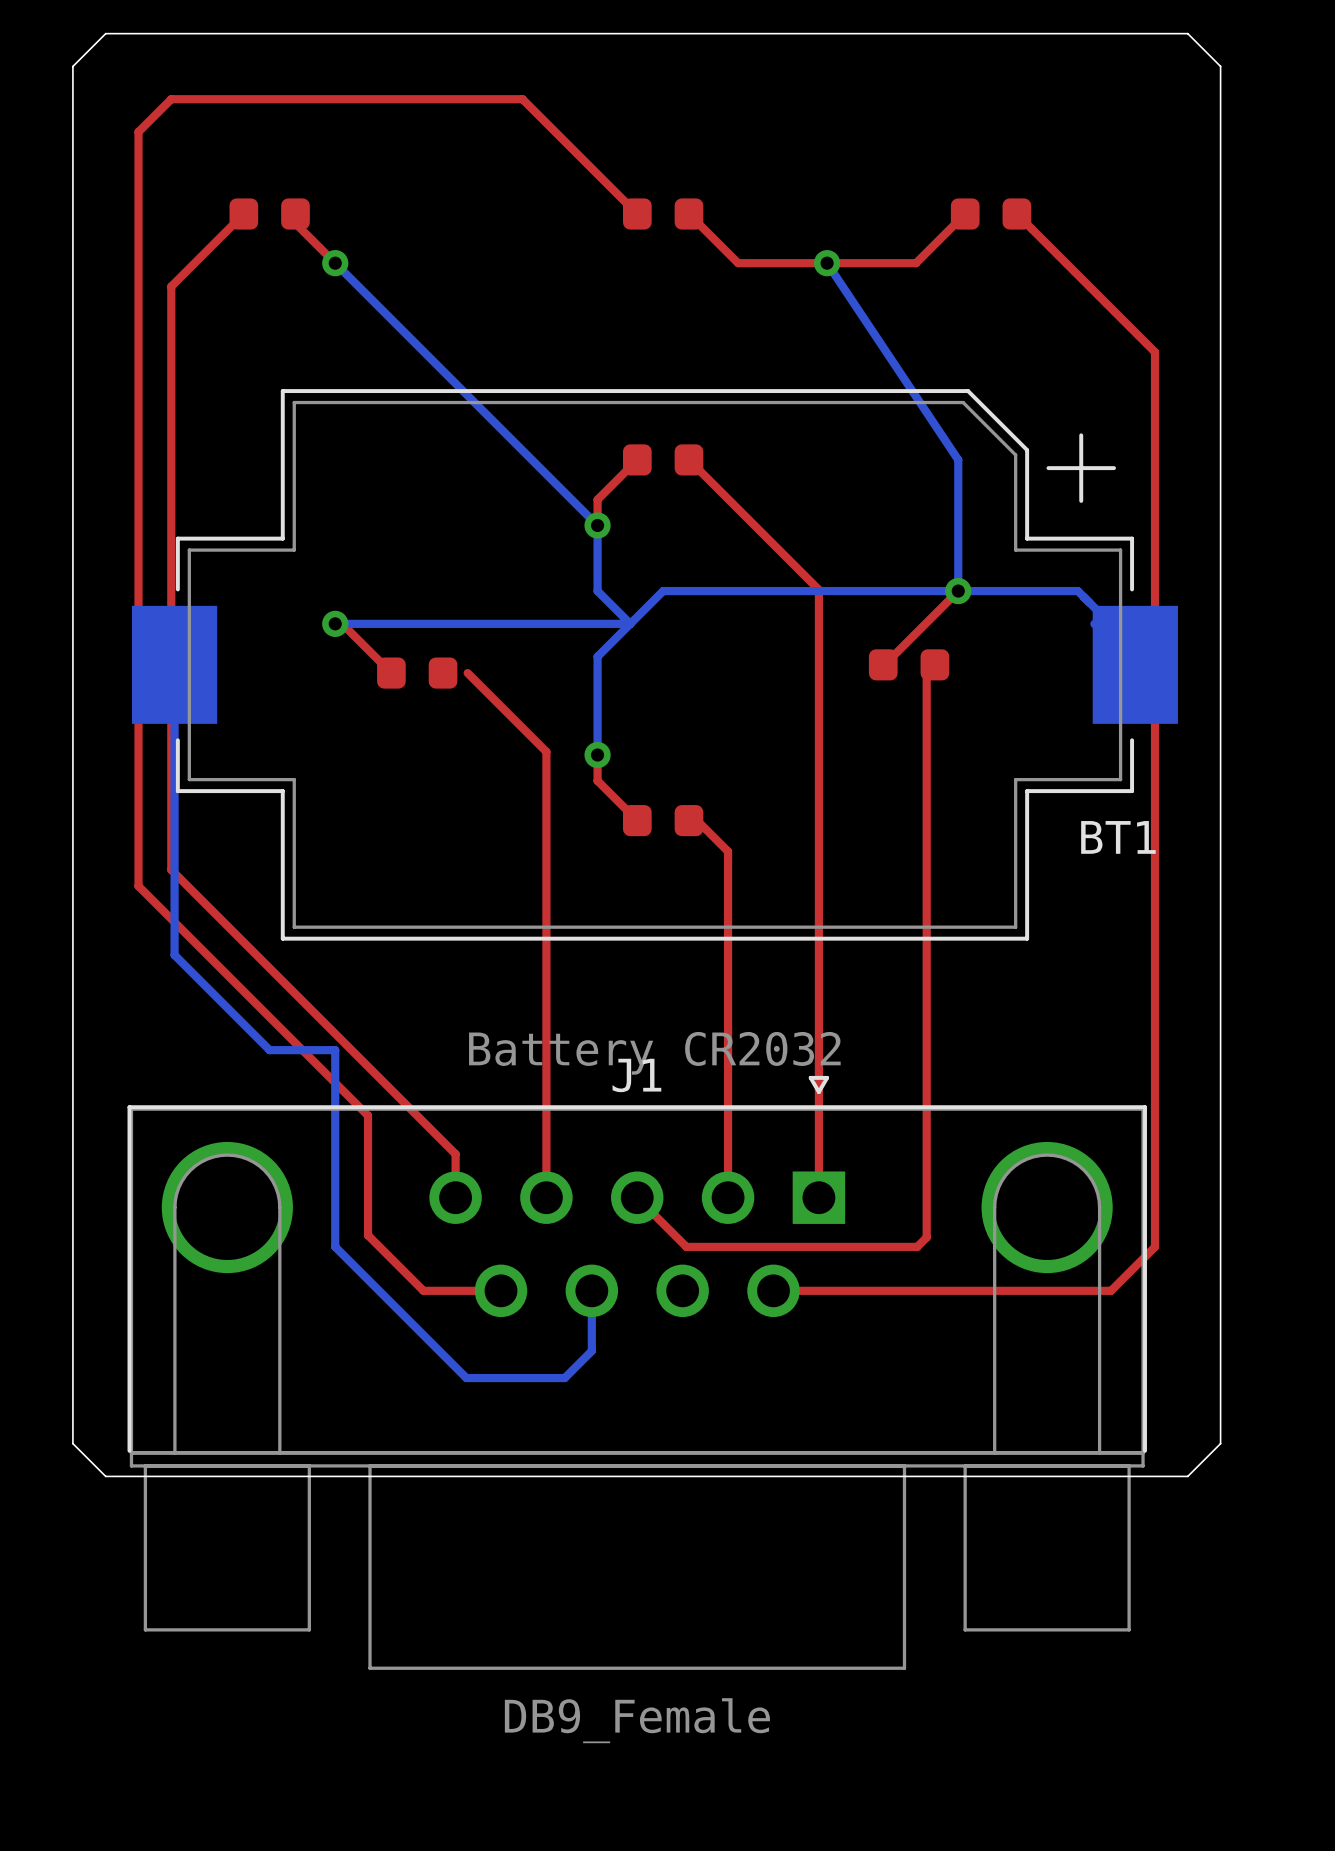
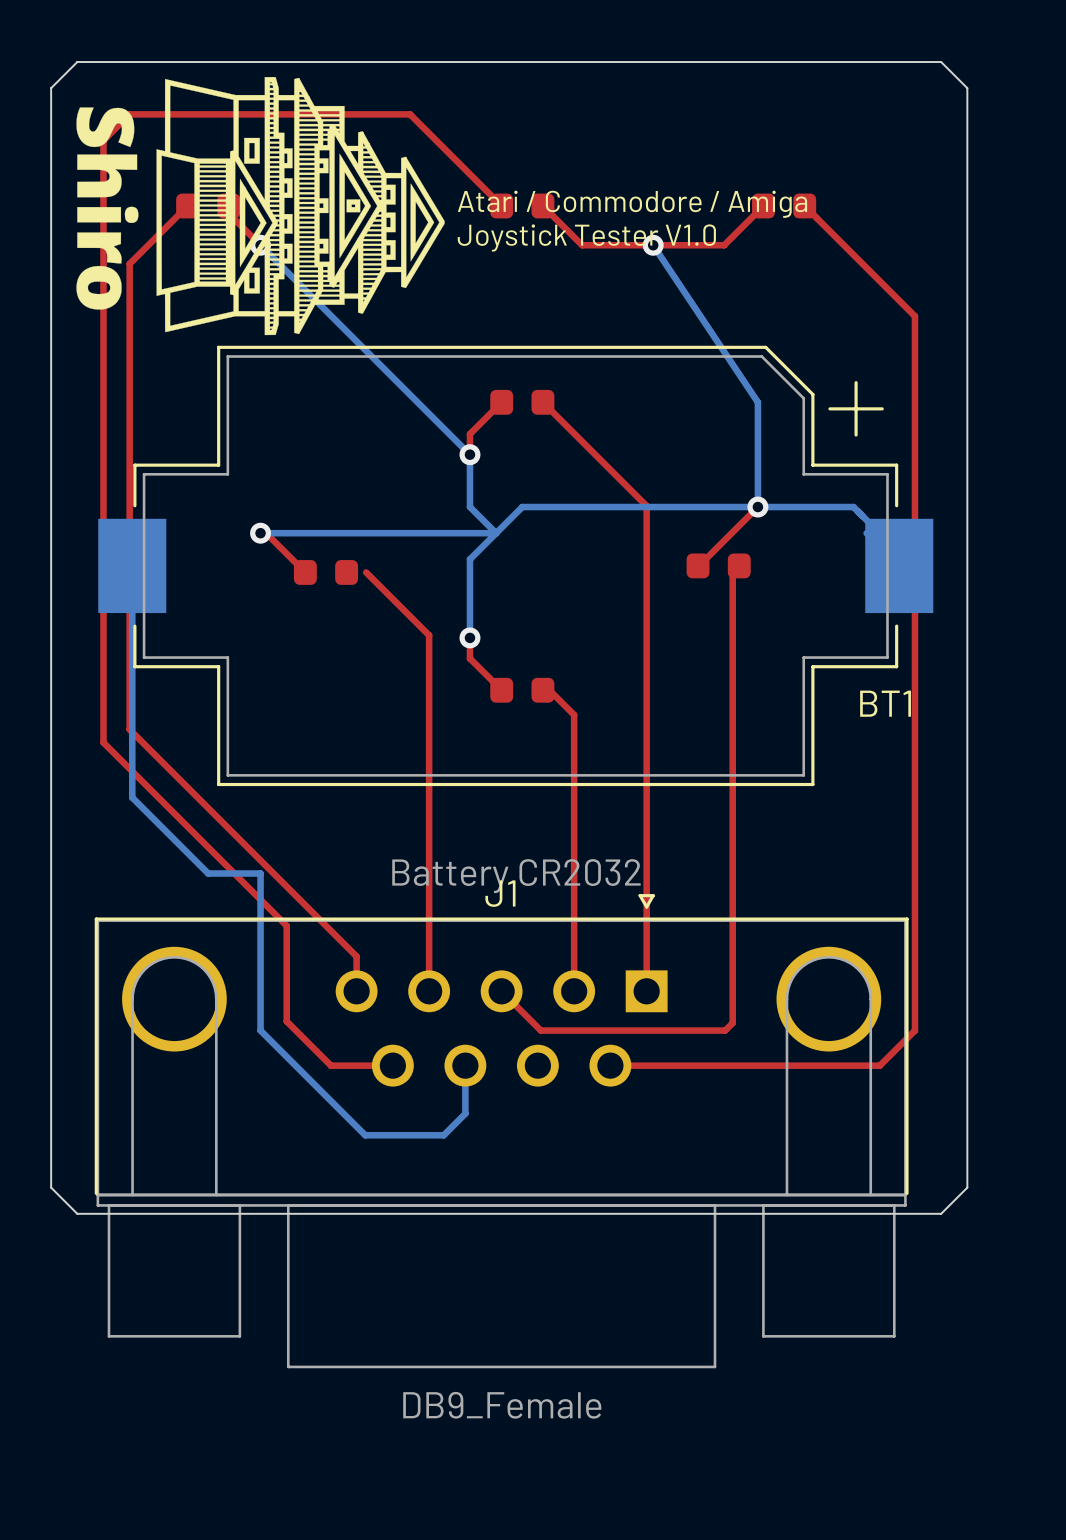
drawing: none -> [76, 77, 445, 336]
text: none -> Atari / Commodore / Amiga (632, 204)
text: none -> Joystick Tester V1.0 (586, 237)

